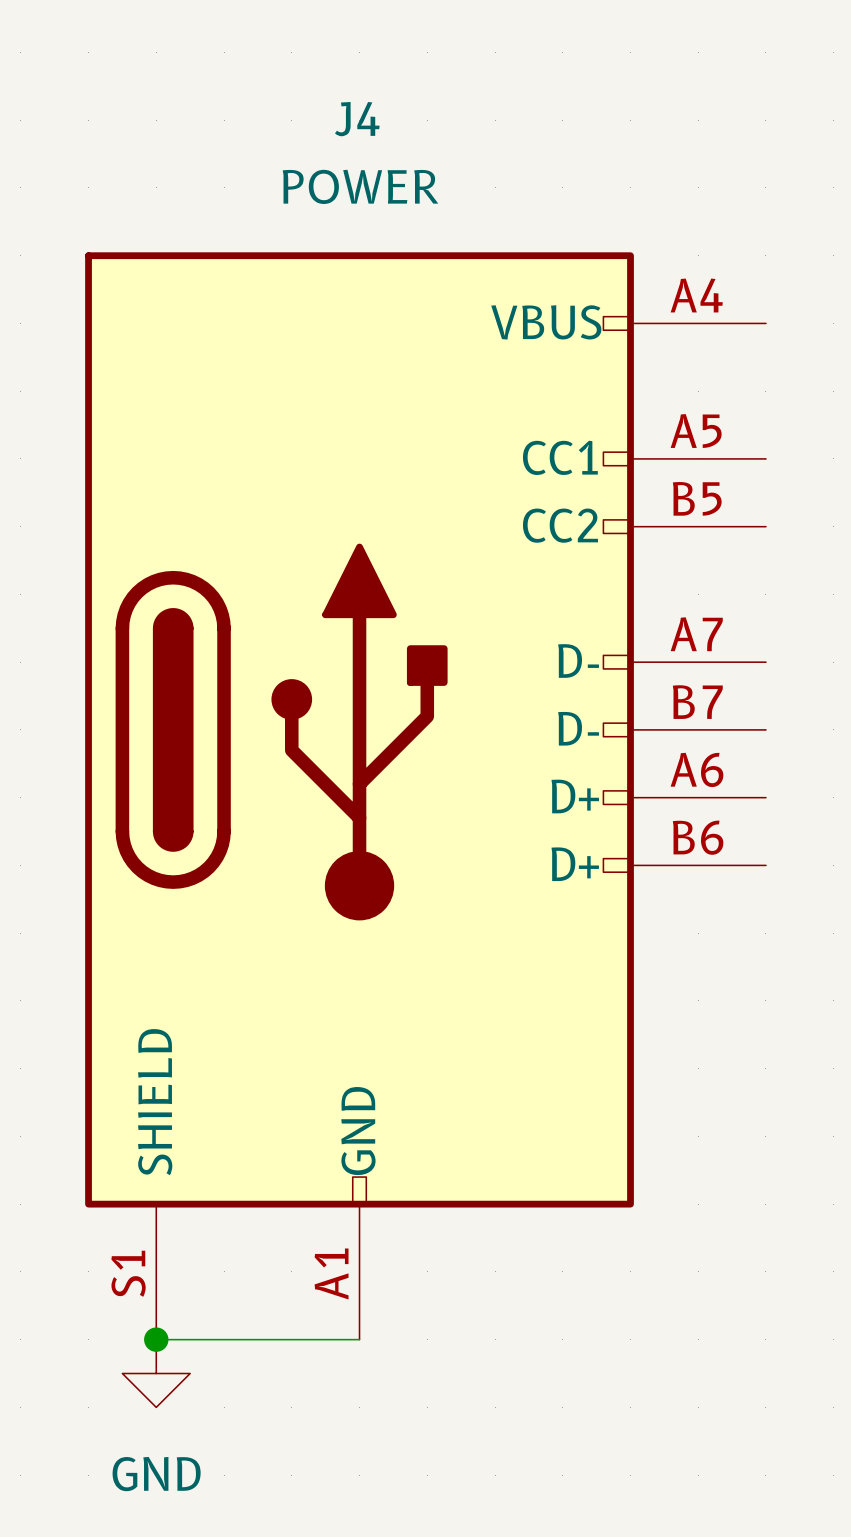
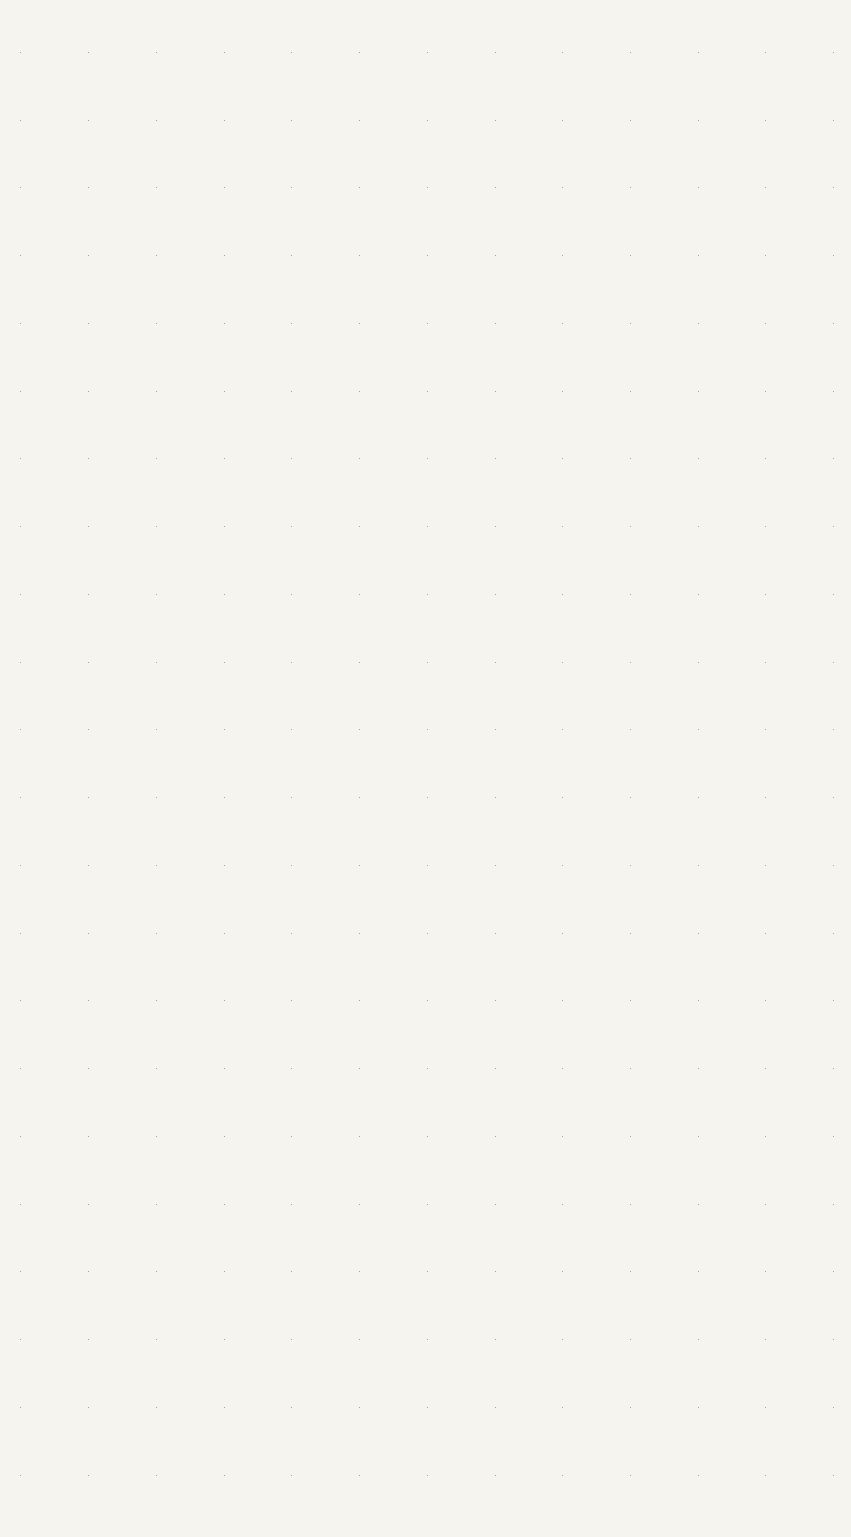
J4: POWER (425, 795) -> none
wire: (156, 1339) (359, 1339) -> none
junction: (156, 1339) -> none
power symbol: GND (156, 1373) -> none

